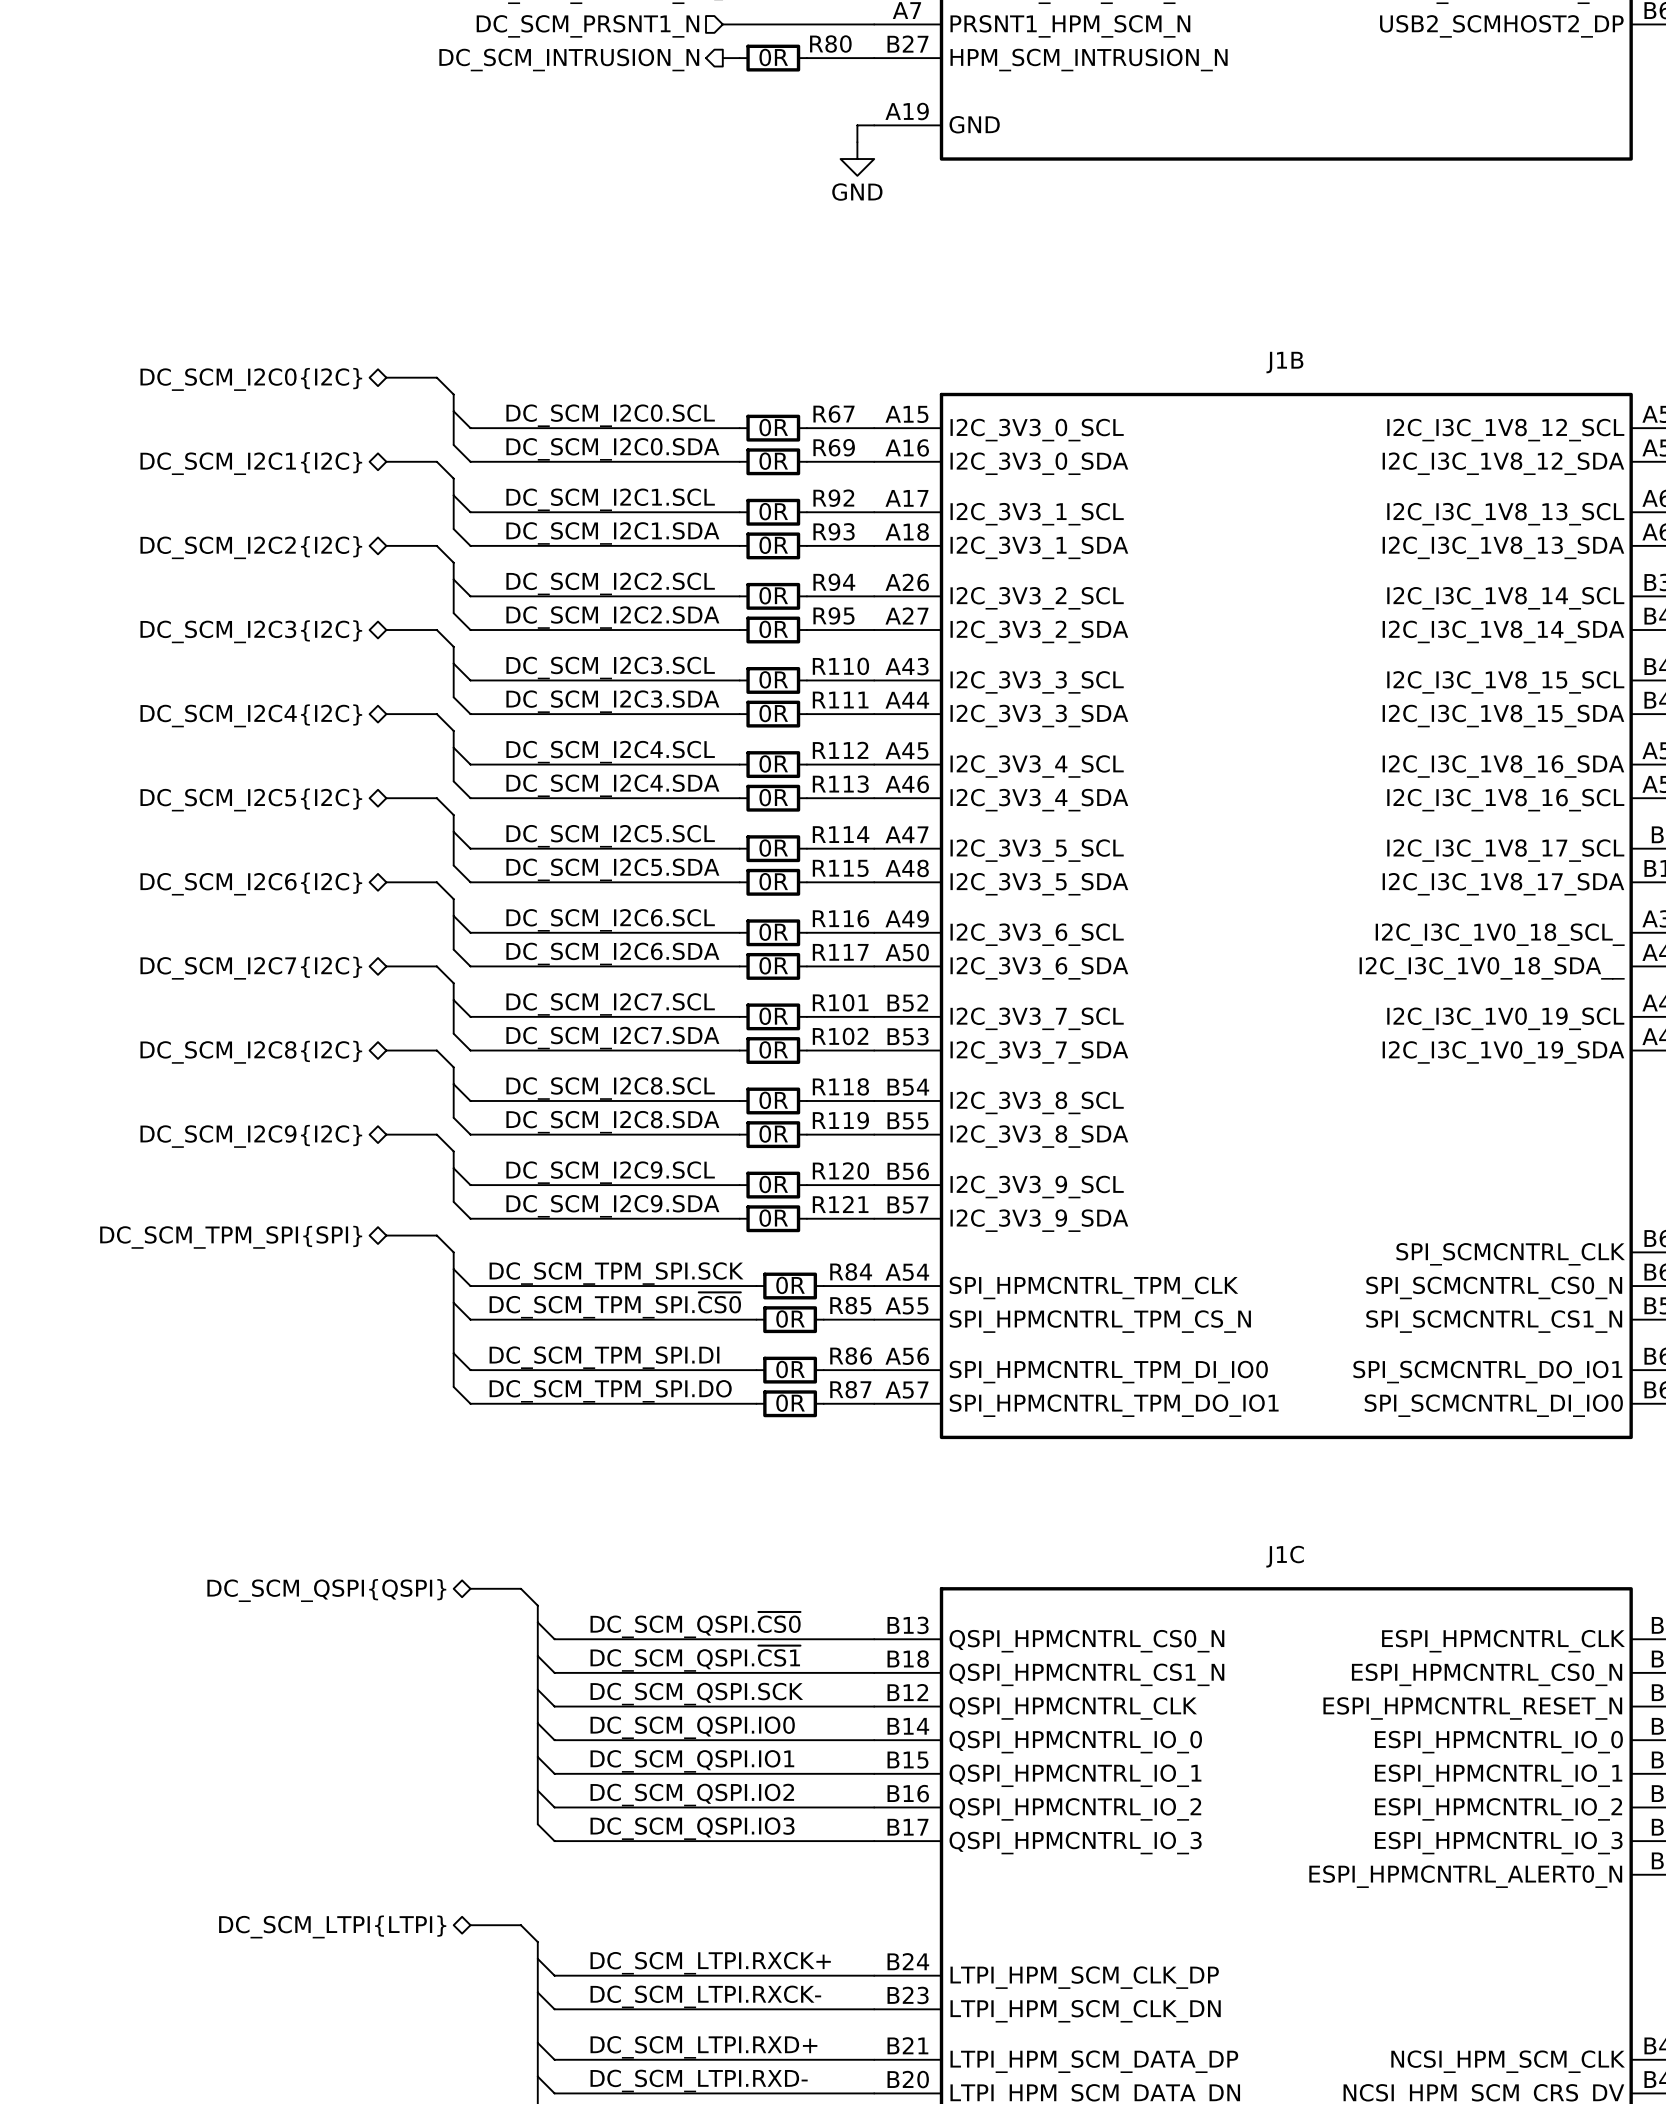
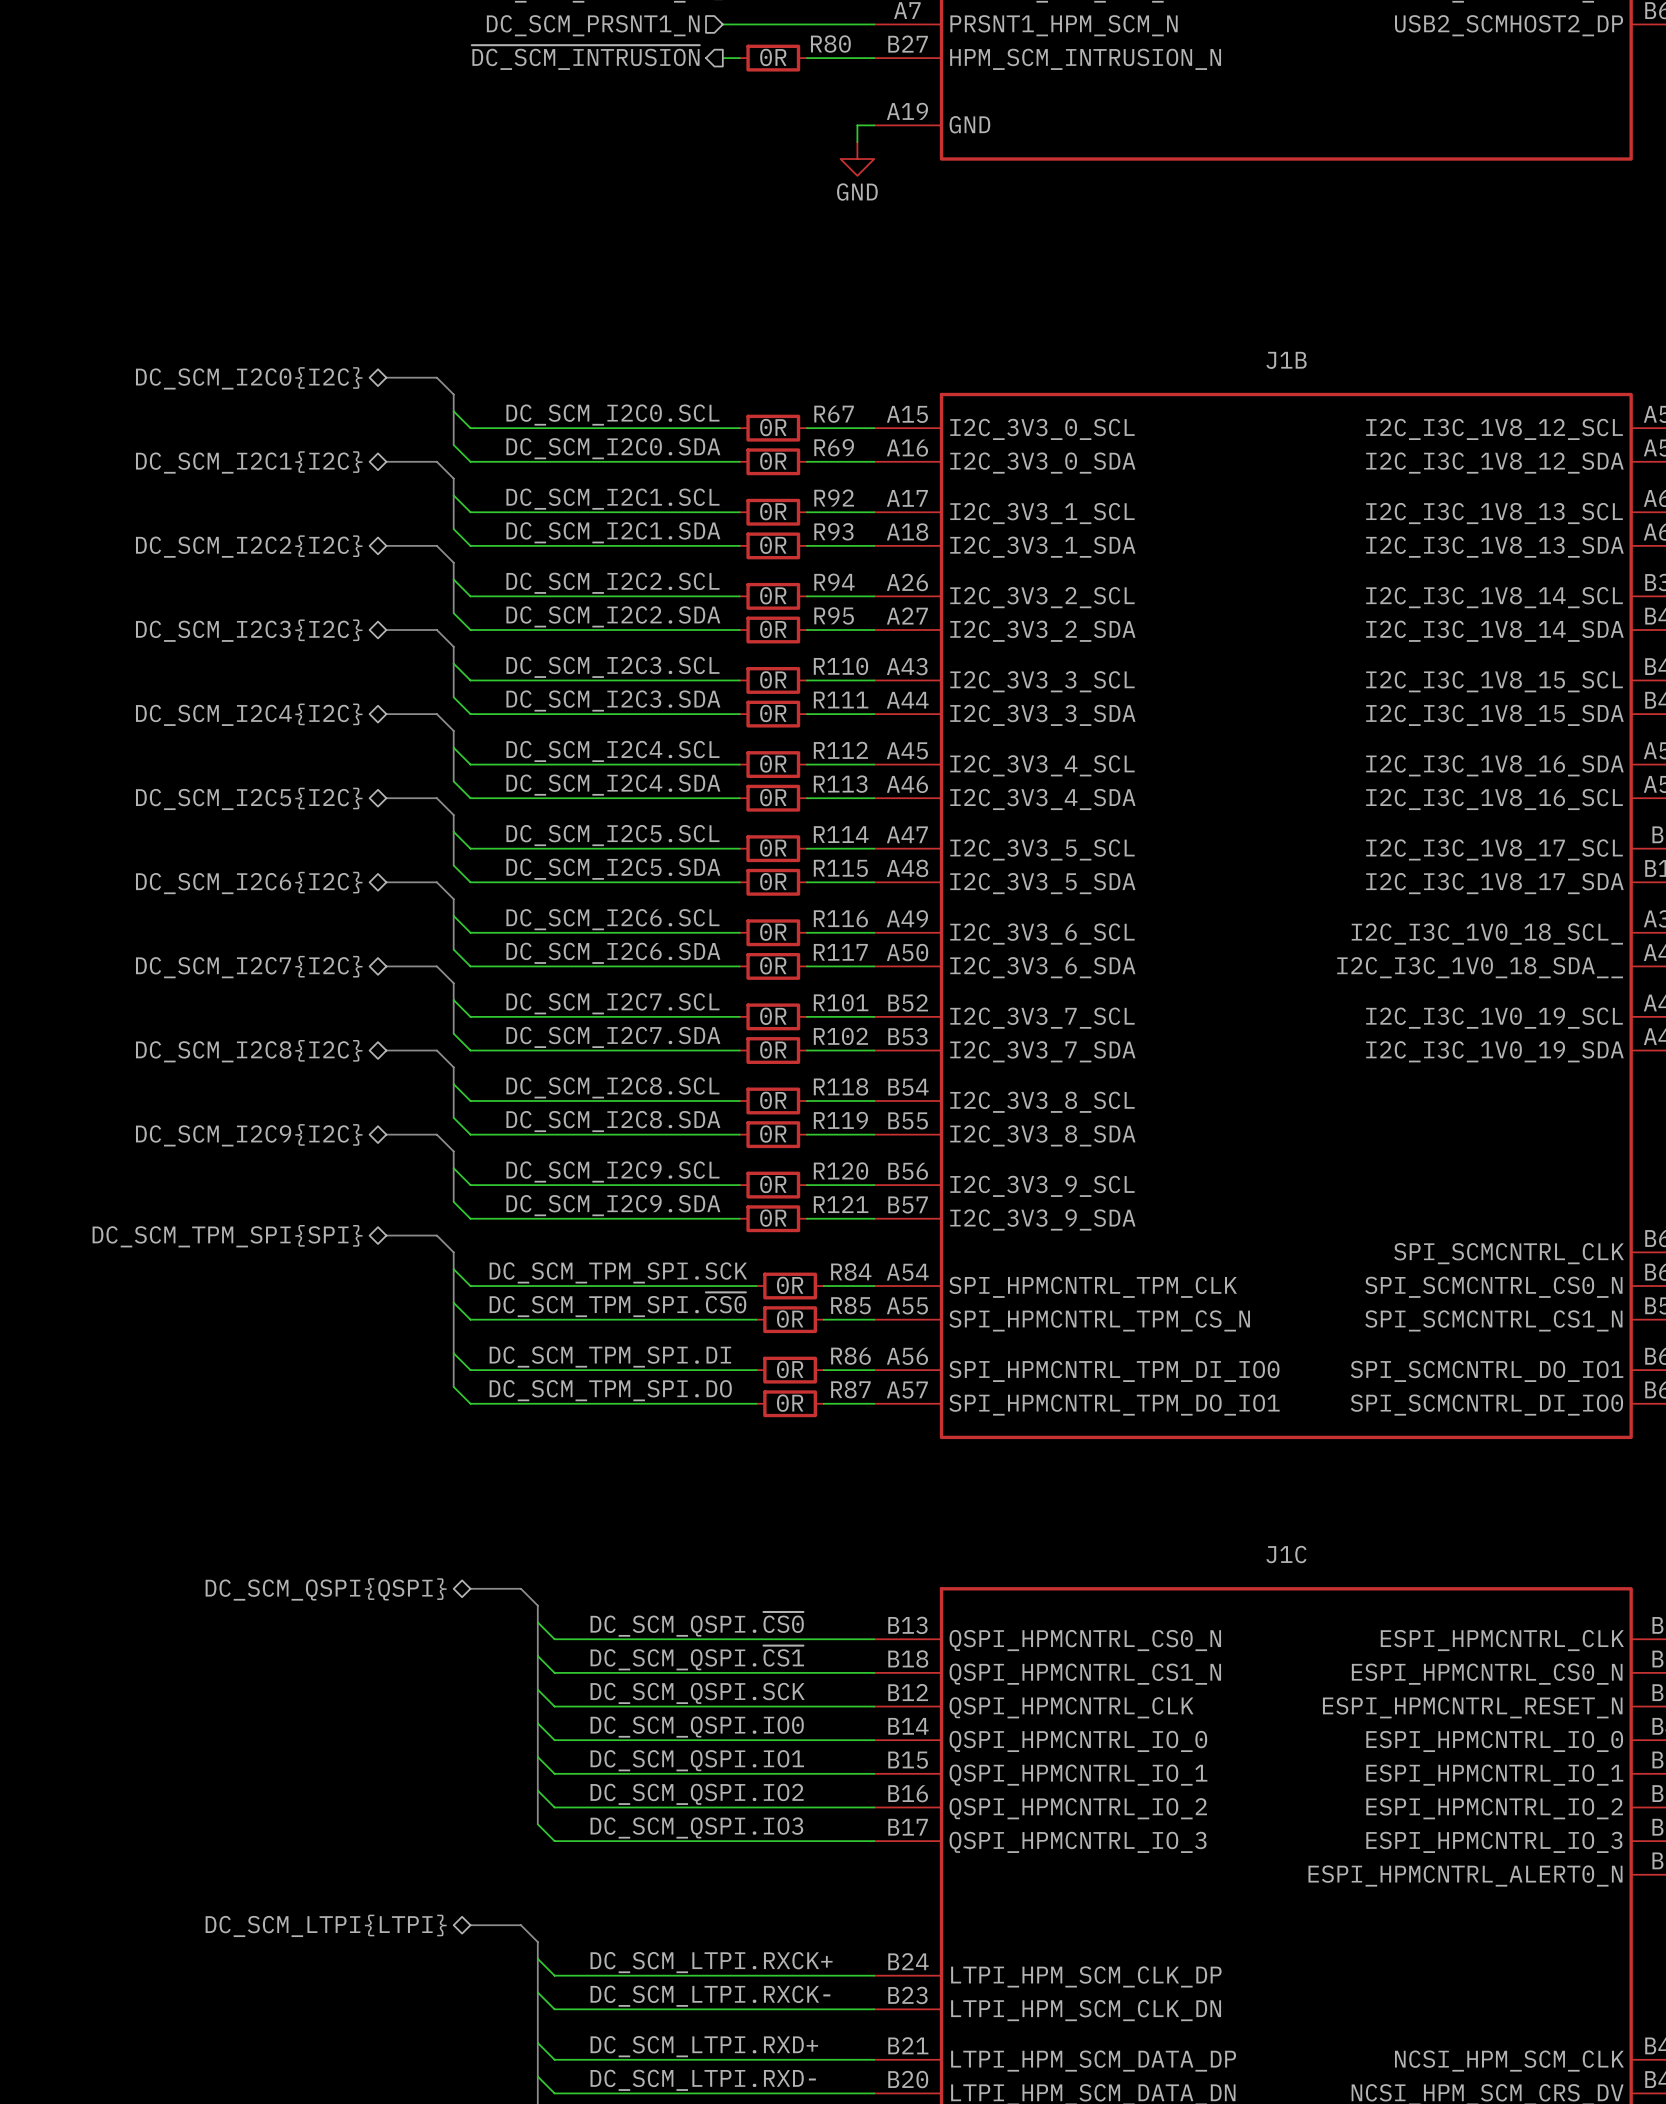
hierarchical label: DC_SCM_INTRUSION_N (569, 60) -> ~{DC_SCM_INTRUSION} (585, 57)

